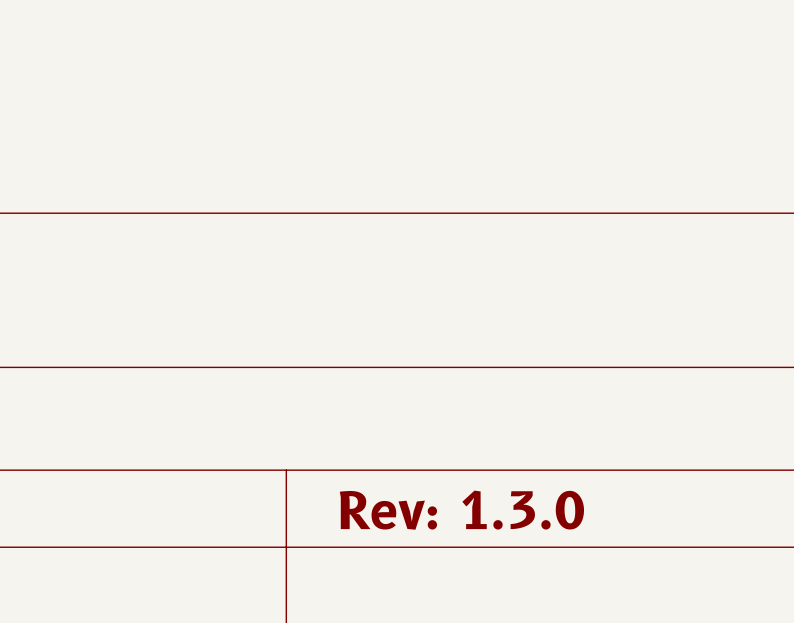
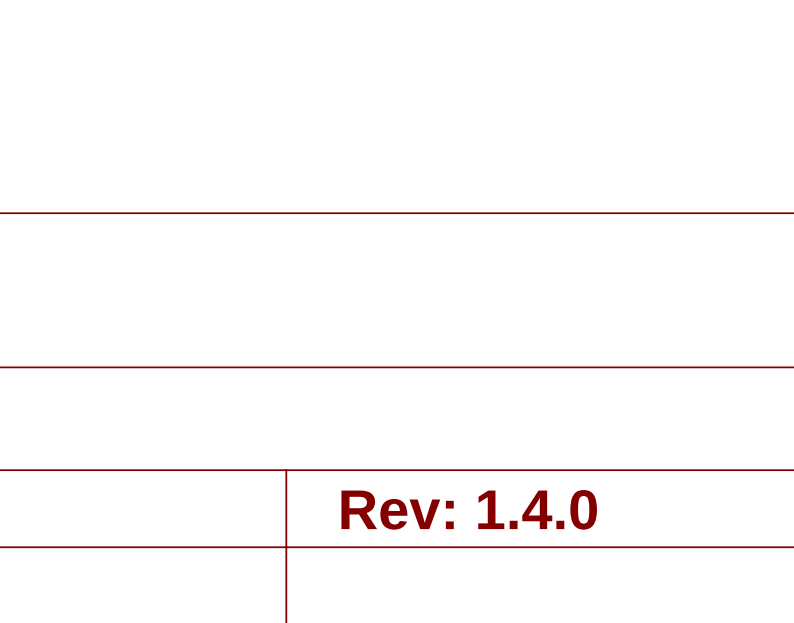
title block: Rev: 1.3.0 (461, 510) -> Rev: 1.4.0 (469, 509)

